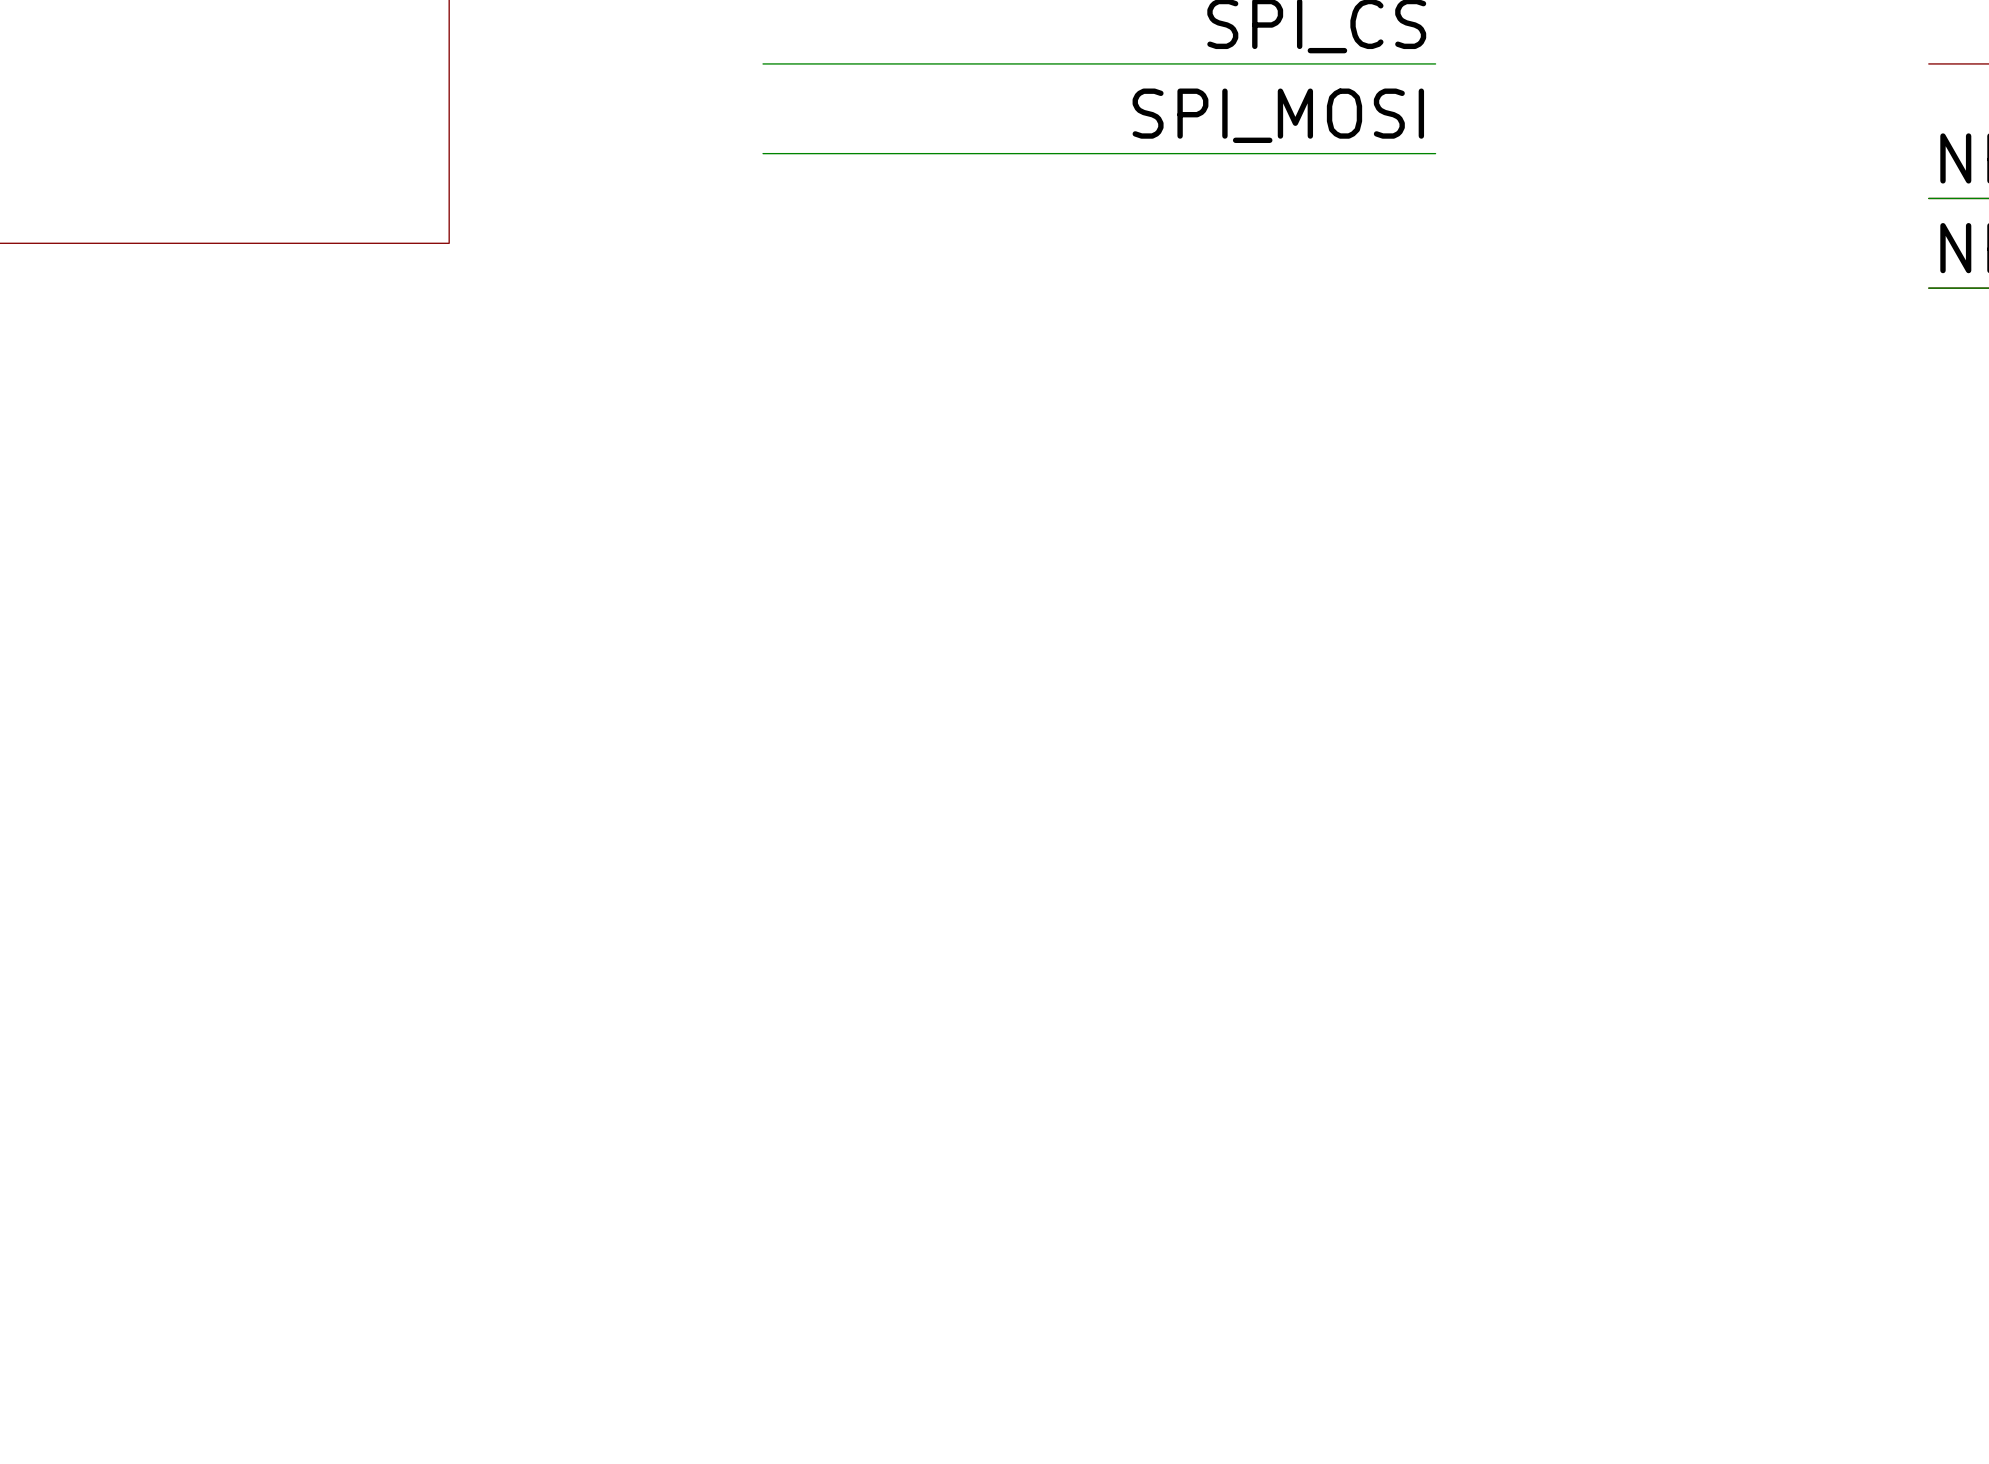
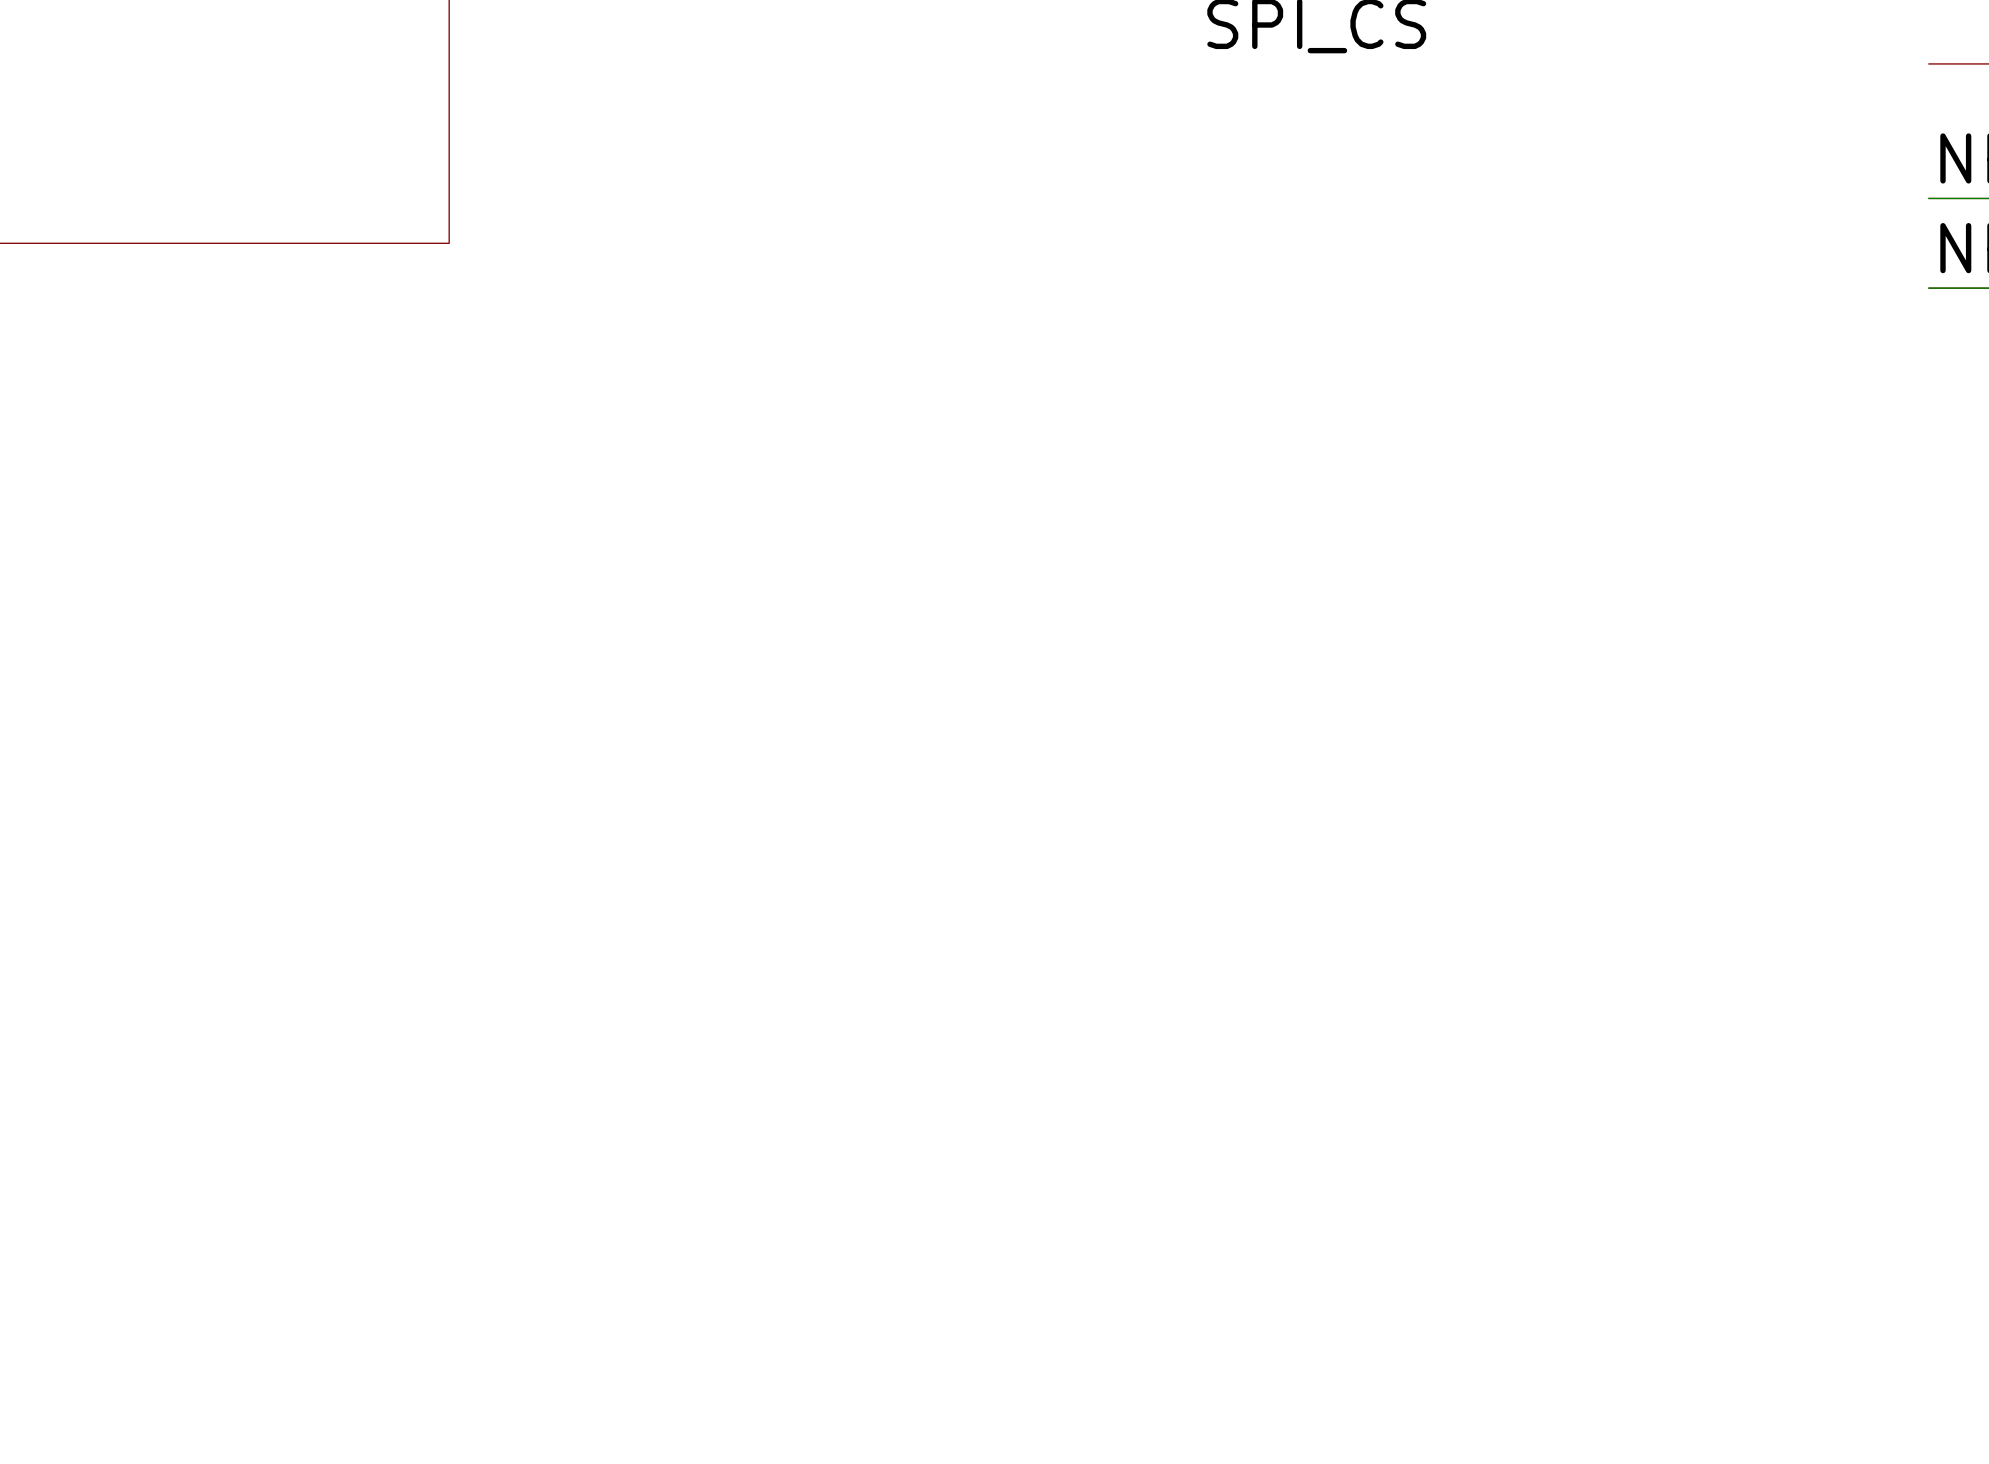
wire: (763, 63) (1435, 63) -> none
label: SPI_MOSI (1278, 115) -> none
wire: (763, 153) (1435, 153) -> none

